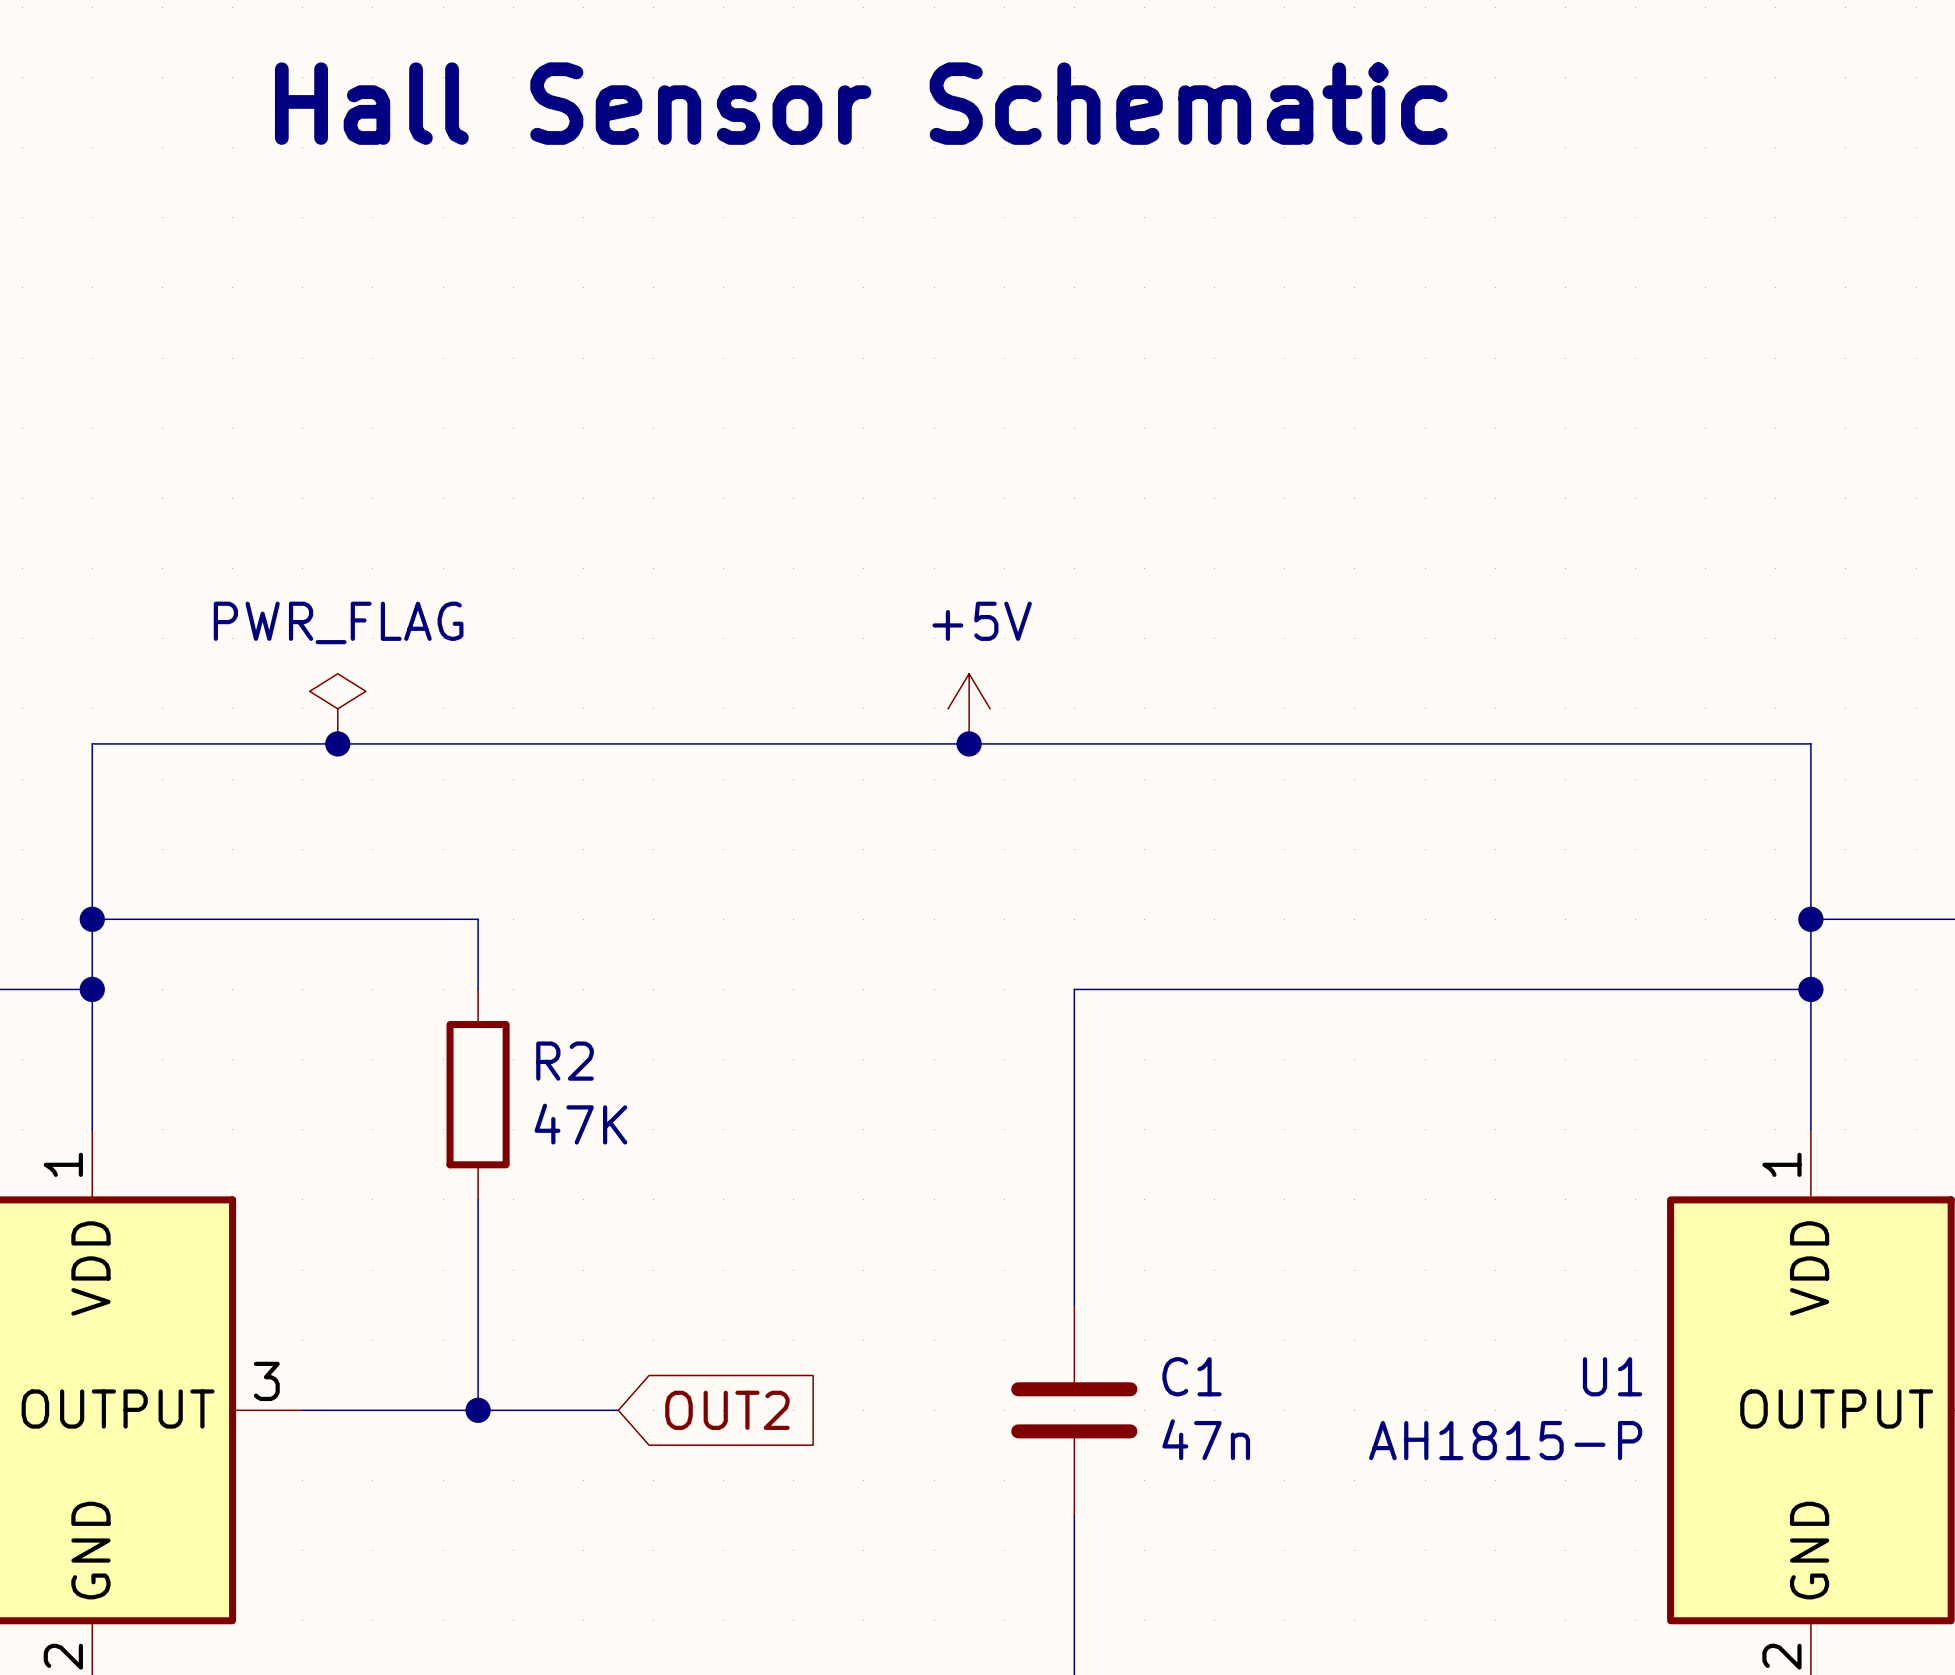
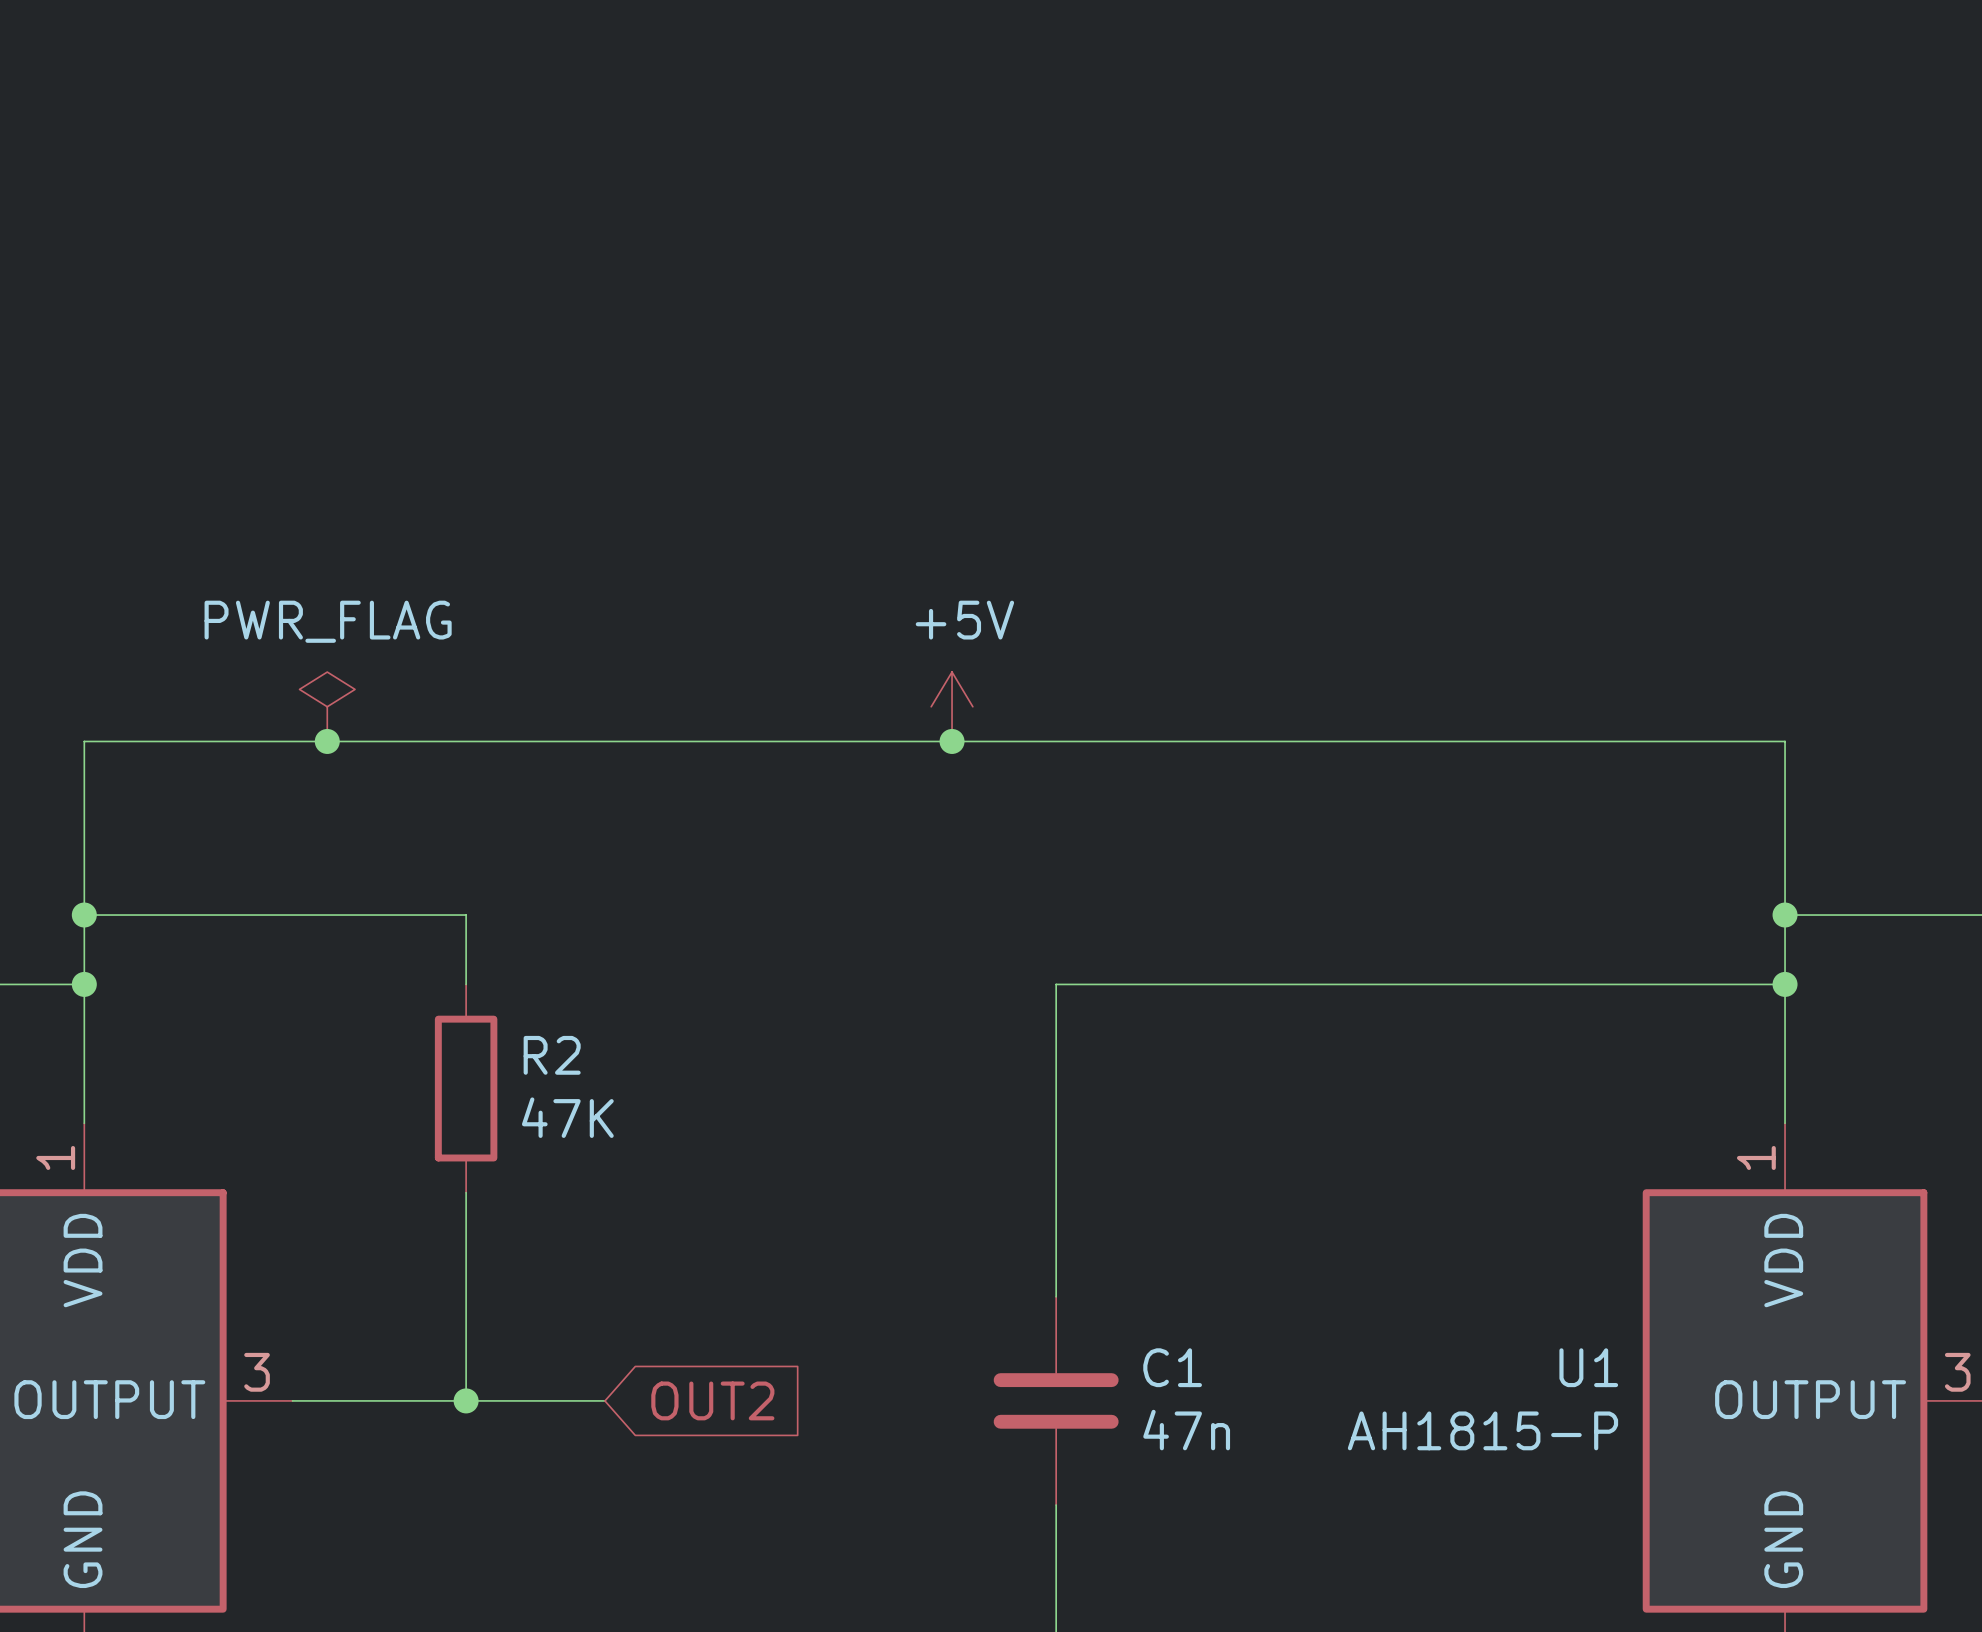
text: Hall Sensor Schematic (861, 103) -> none

